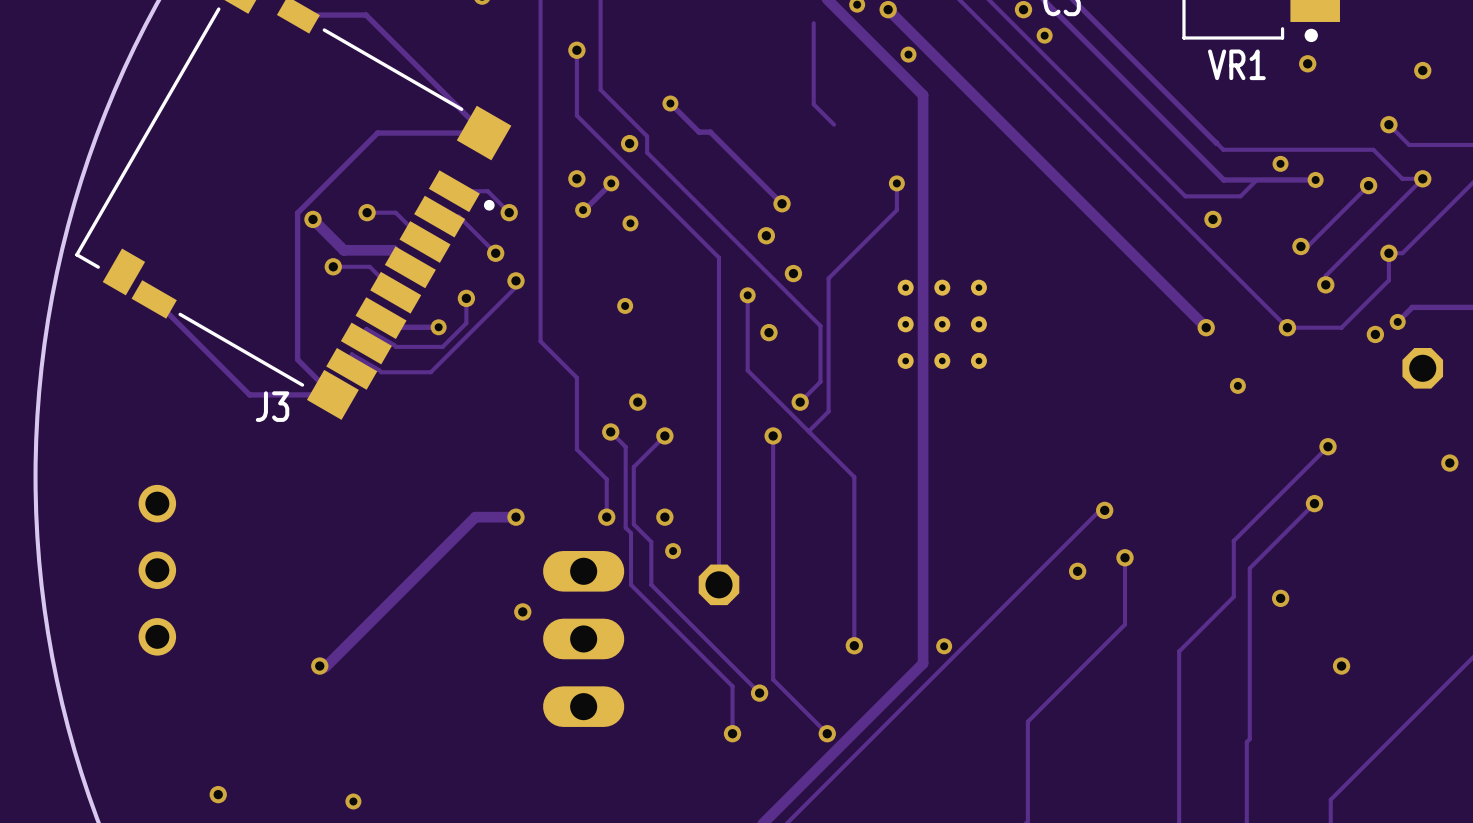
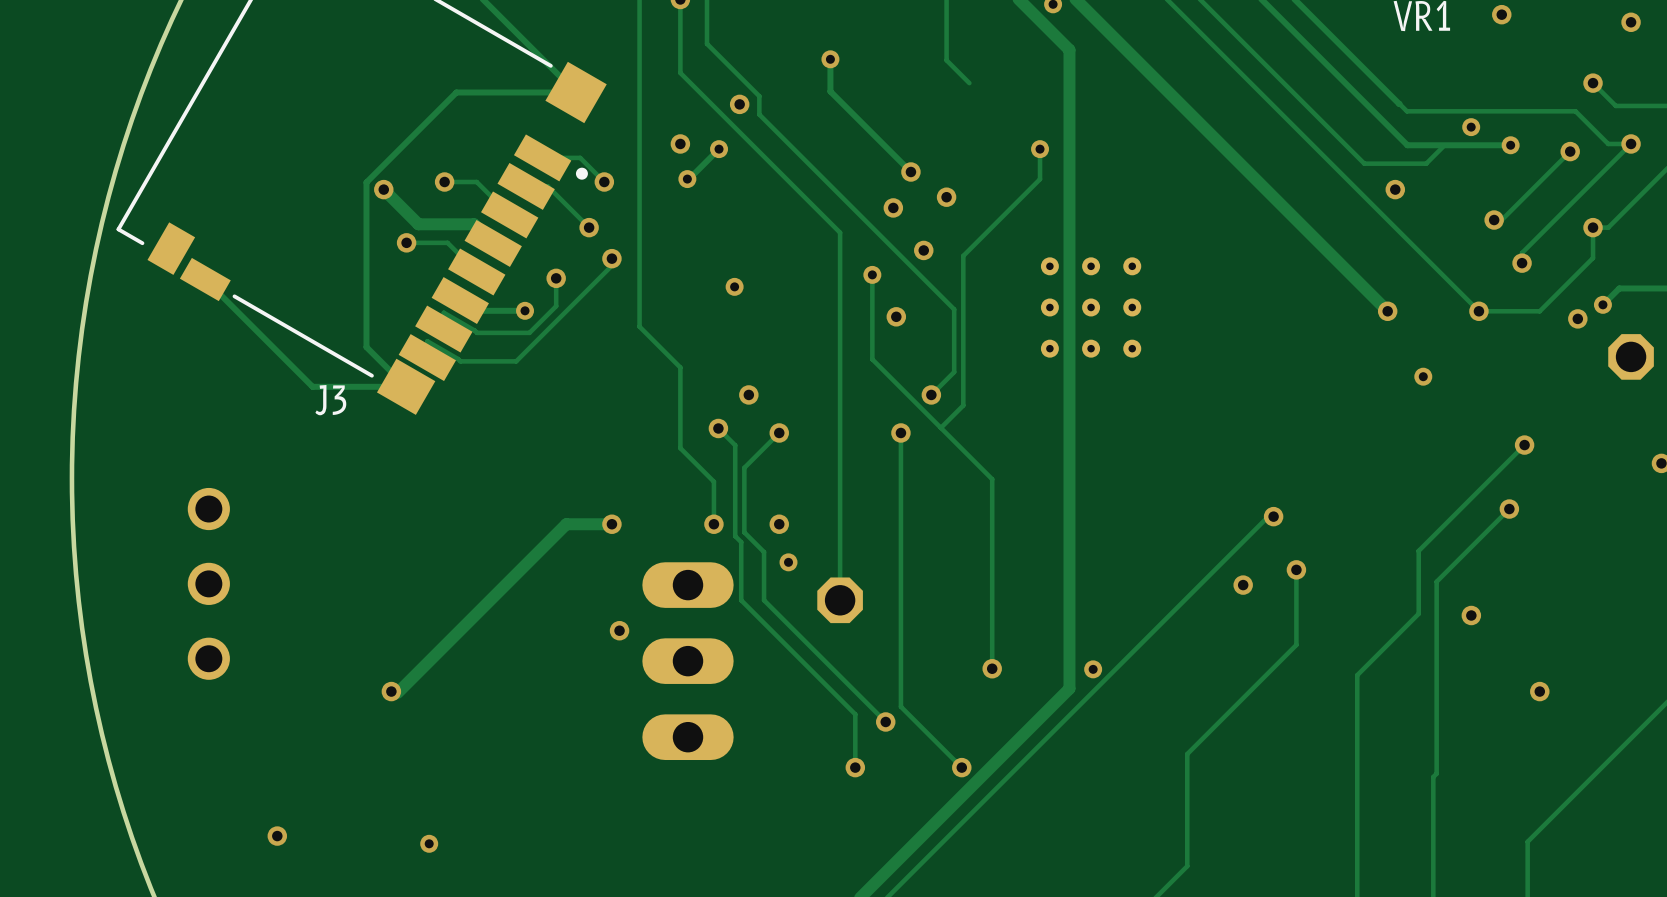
track: (670, 103) (699, 132) (710, 132) -> (830, 59) (830, 91)
via position: (670, 103) -> (830, 59)
via: (630, 223) -> none
via: none -> (946, 197)

